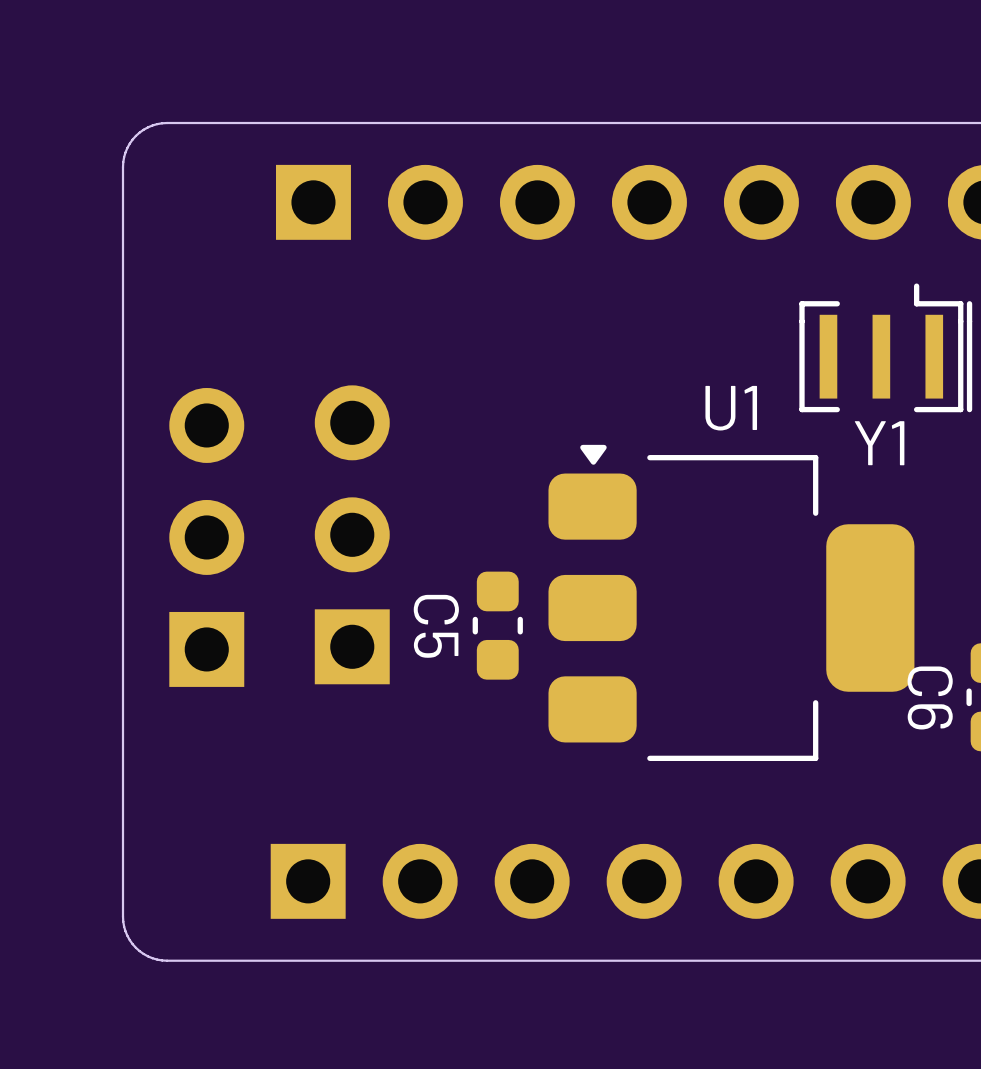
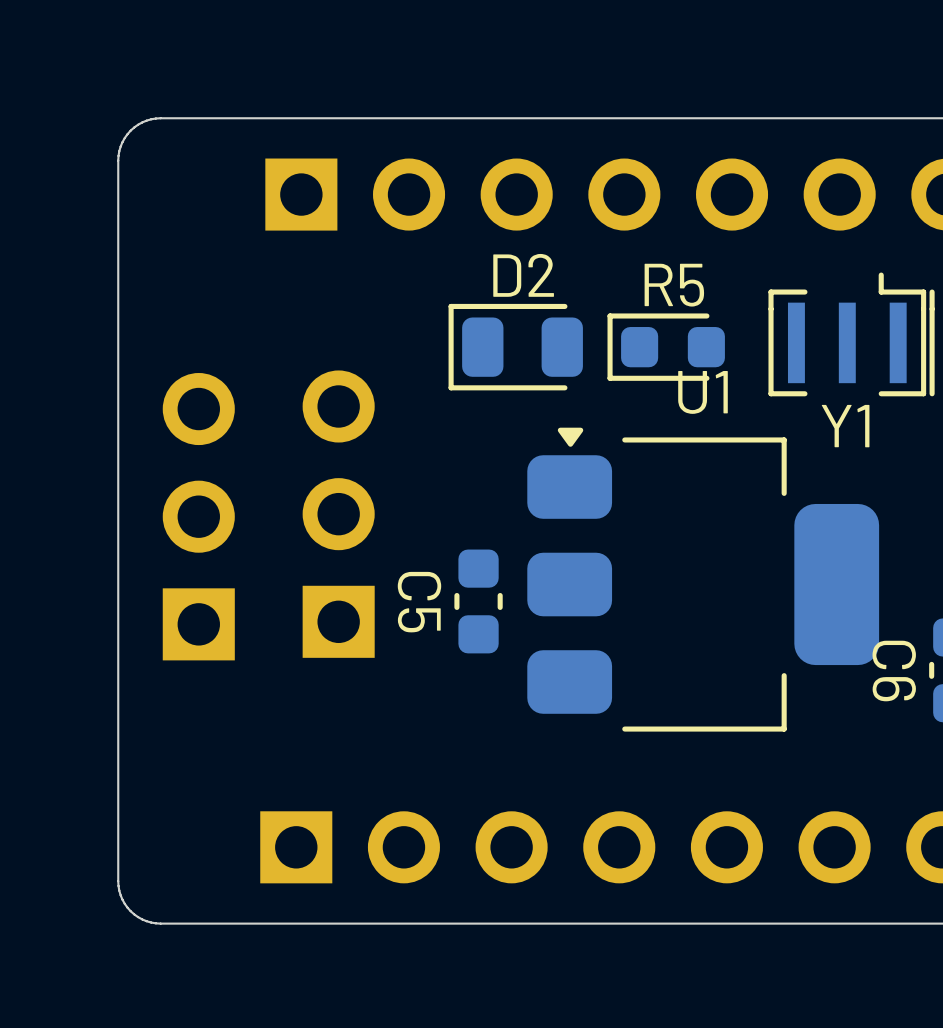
D2: none -> (515, 347)
R5: none -> (666, 347)

